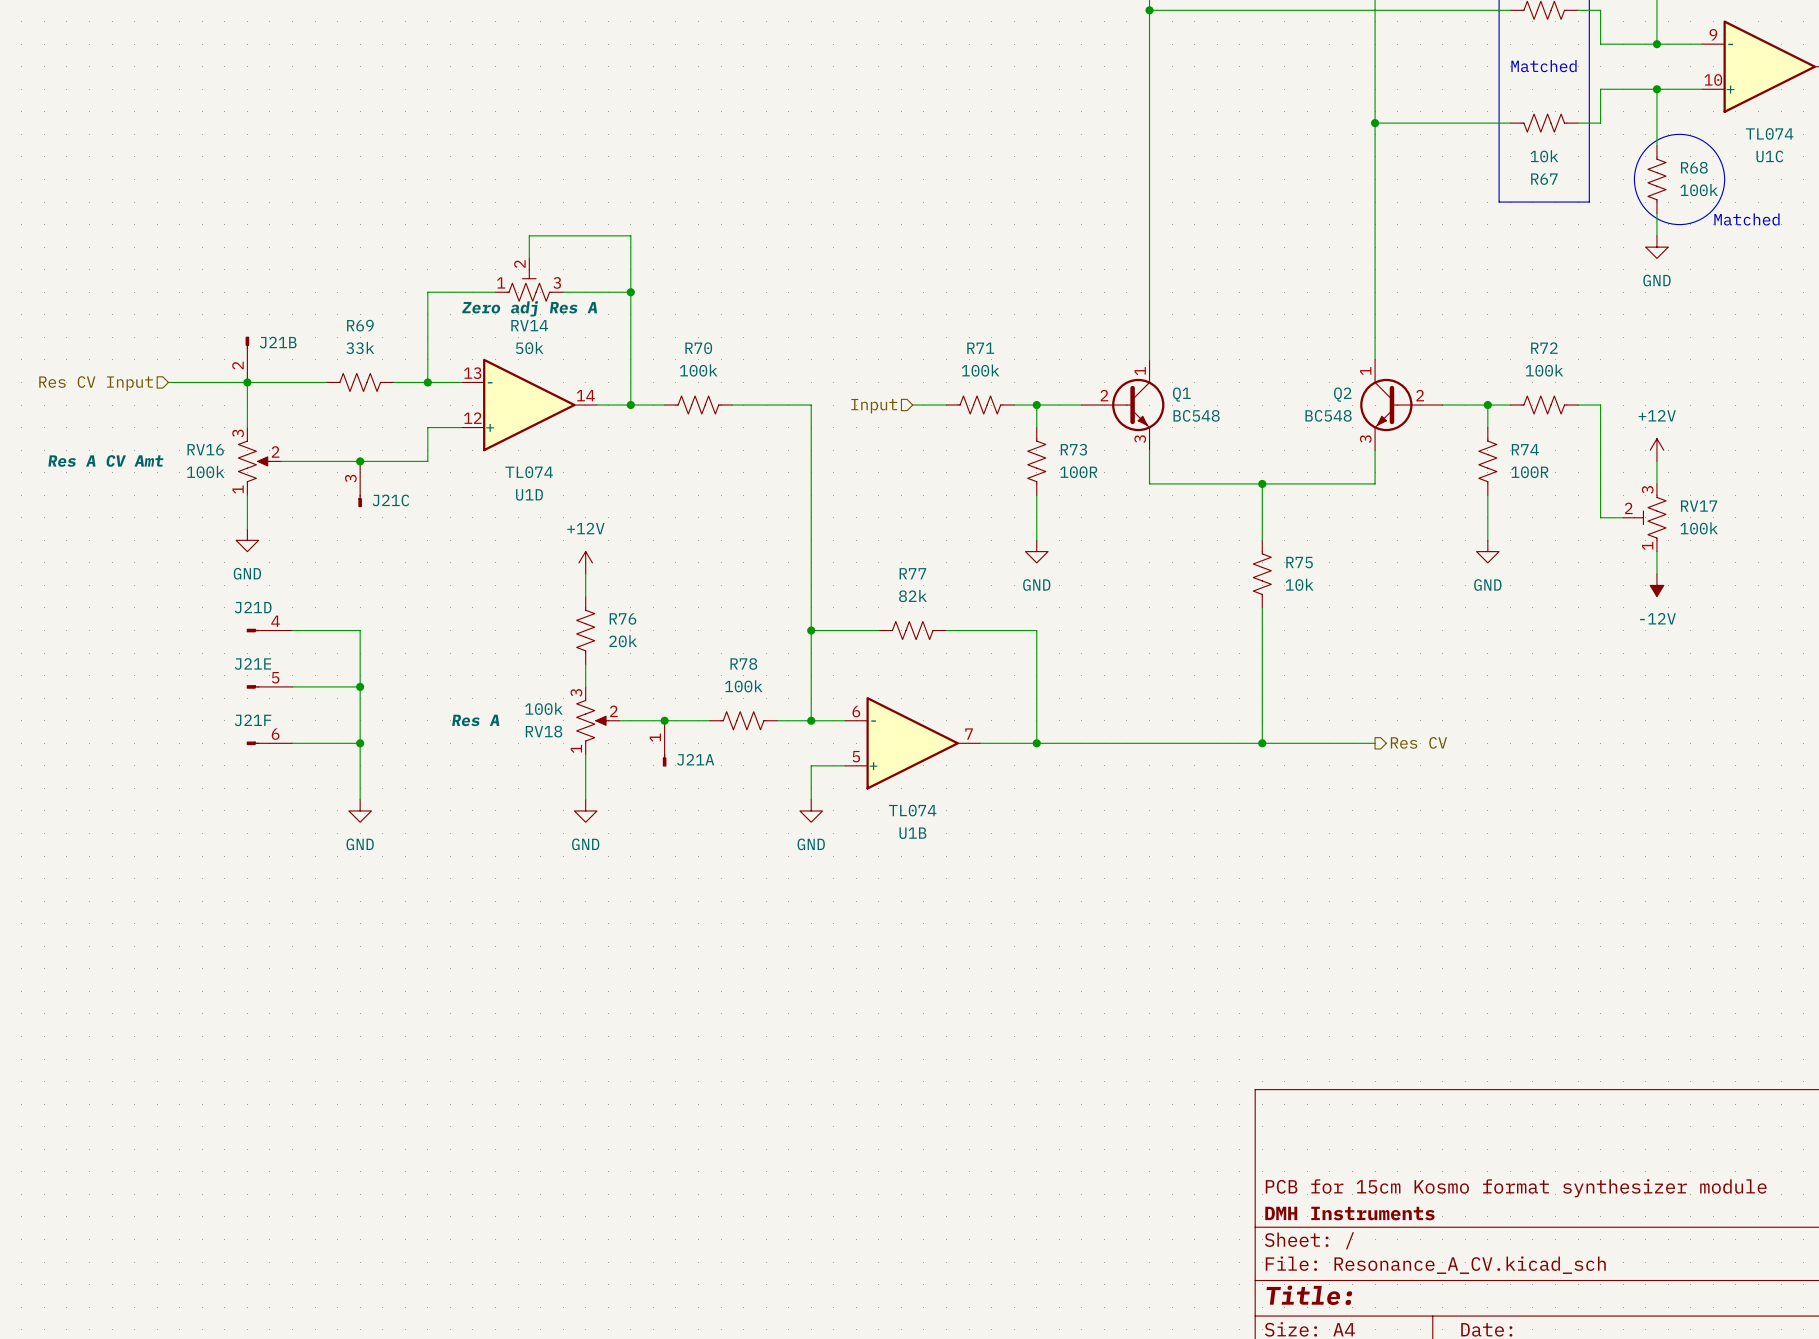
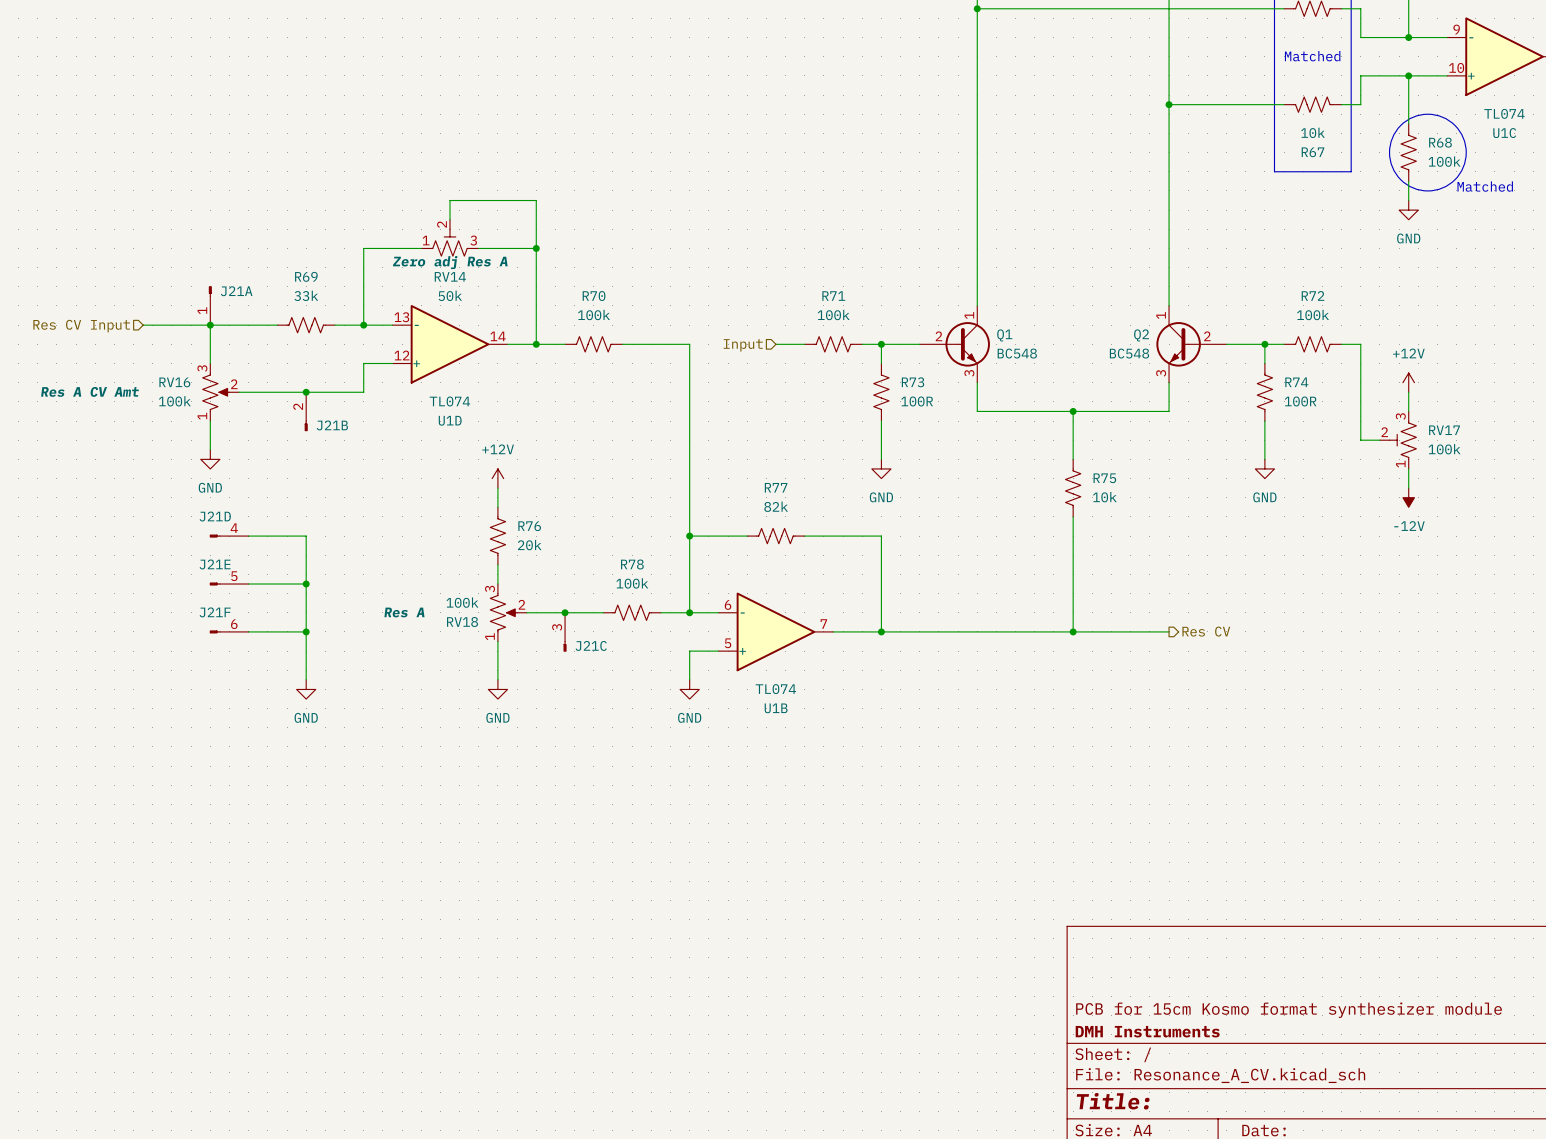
J21B rotation: 0° (247, 342) -> 180° (306, 425)
J21B name position: J21B (278, 342) -> J21B (332, 425)
J21B position: (247, 359) -> (306, 411)
J21C position: (360, 484) -> (565, 632)
J21A position: (664, 743) -> (210, 305)
J21A name position: J21A (695, 759) -> J21A (236, 291)
J21A rotation: 0° (664, 760) -> 180° (210, 291)

